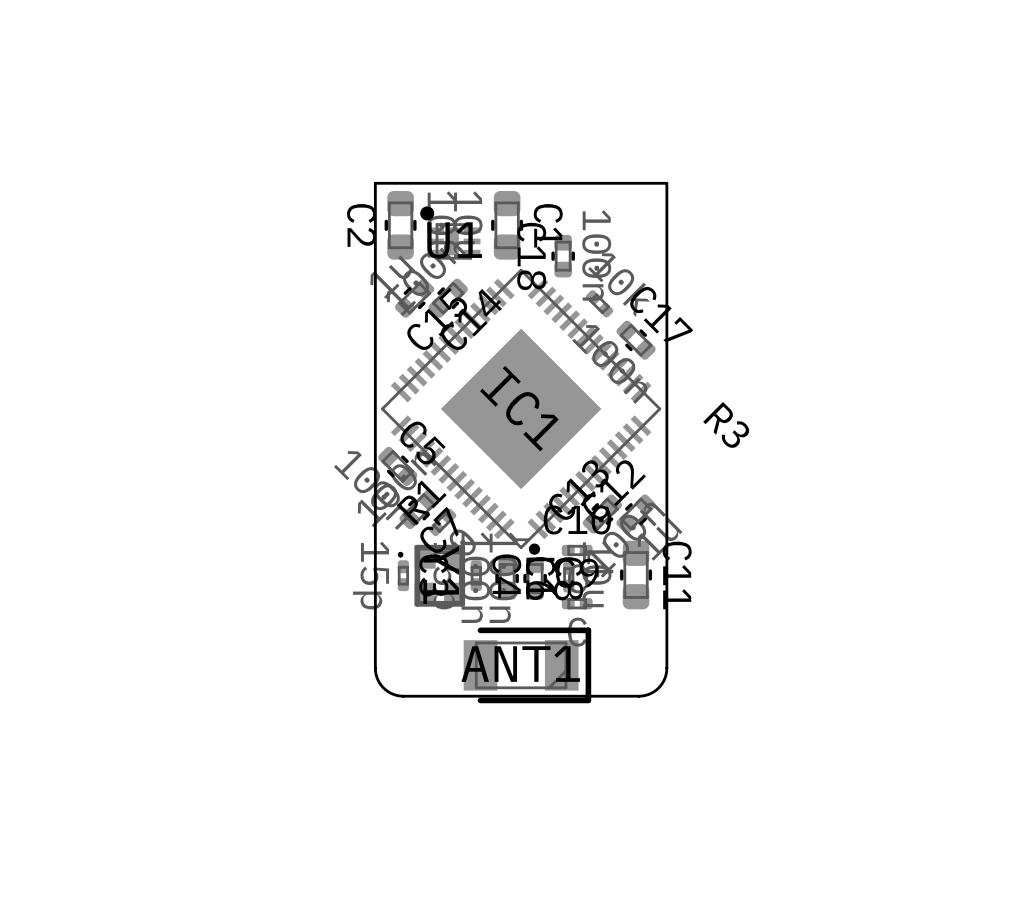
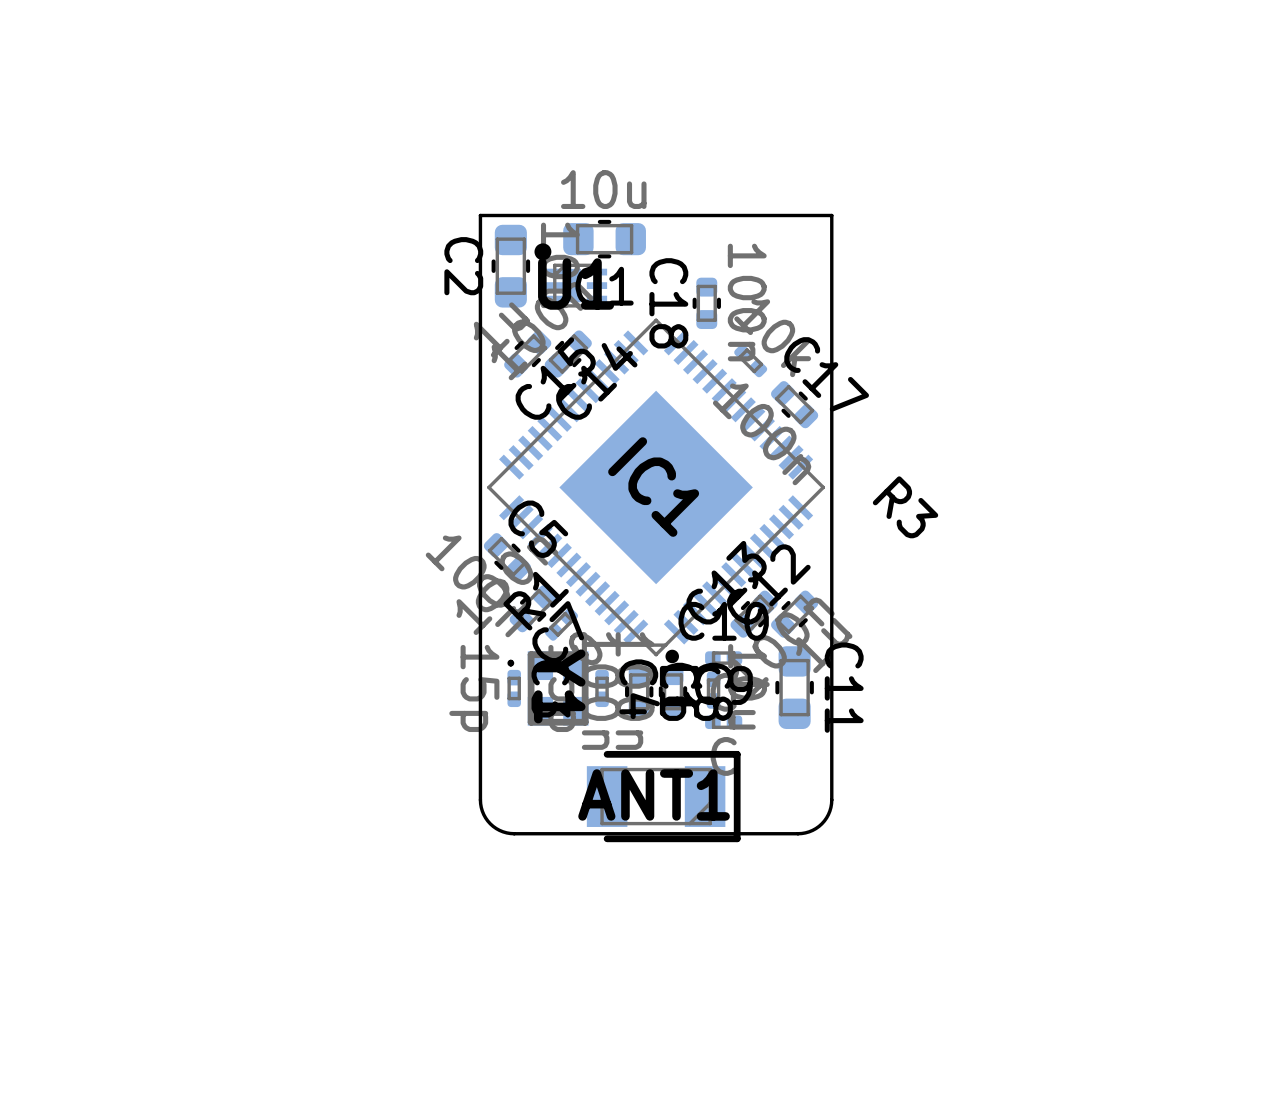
C1 rotation: 0° (507, 225) -> 90° clockwise (604, 239)

